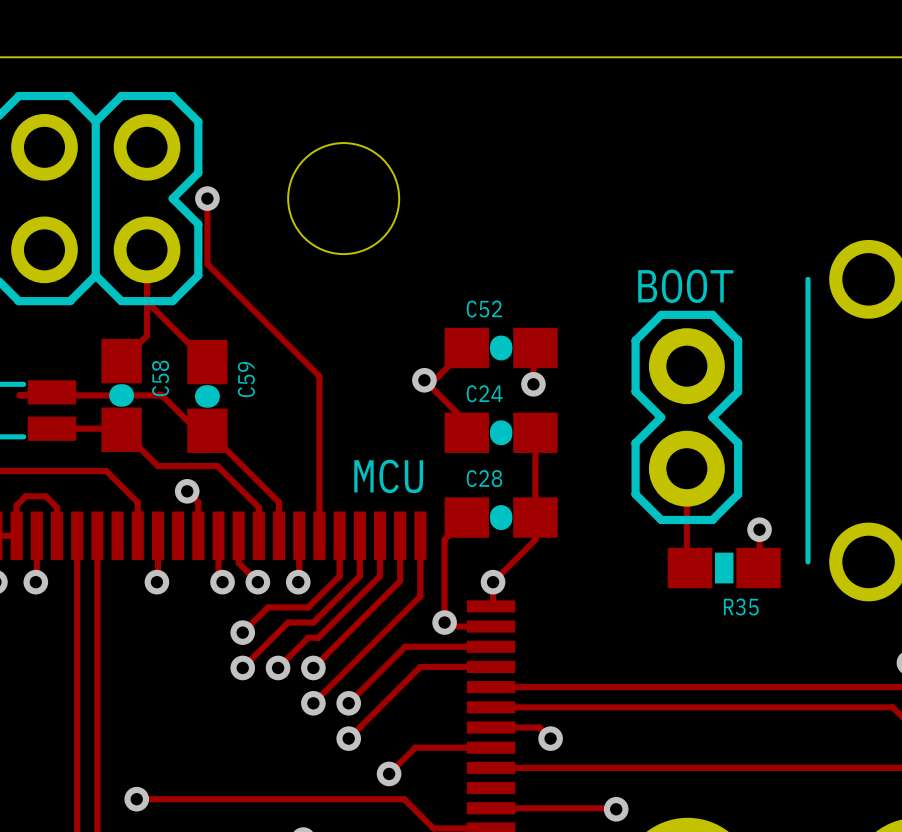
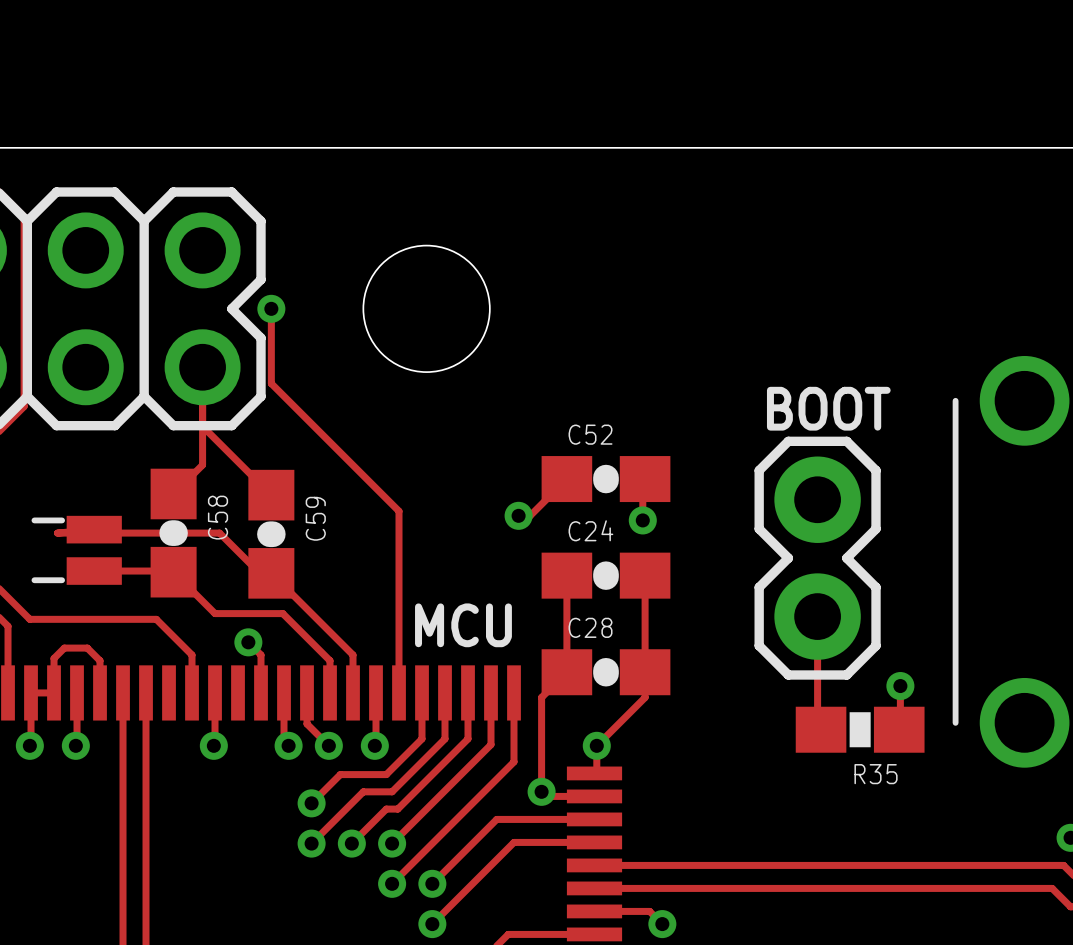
track: (424, 380) (466, 422) (466, 432) -> (566, 672) (566, 575)

